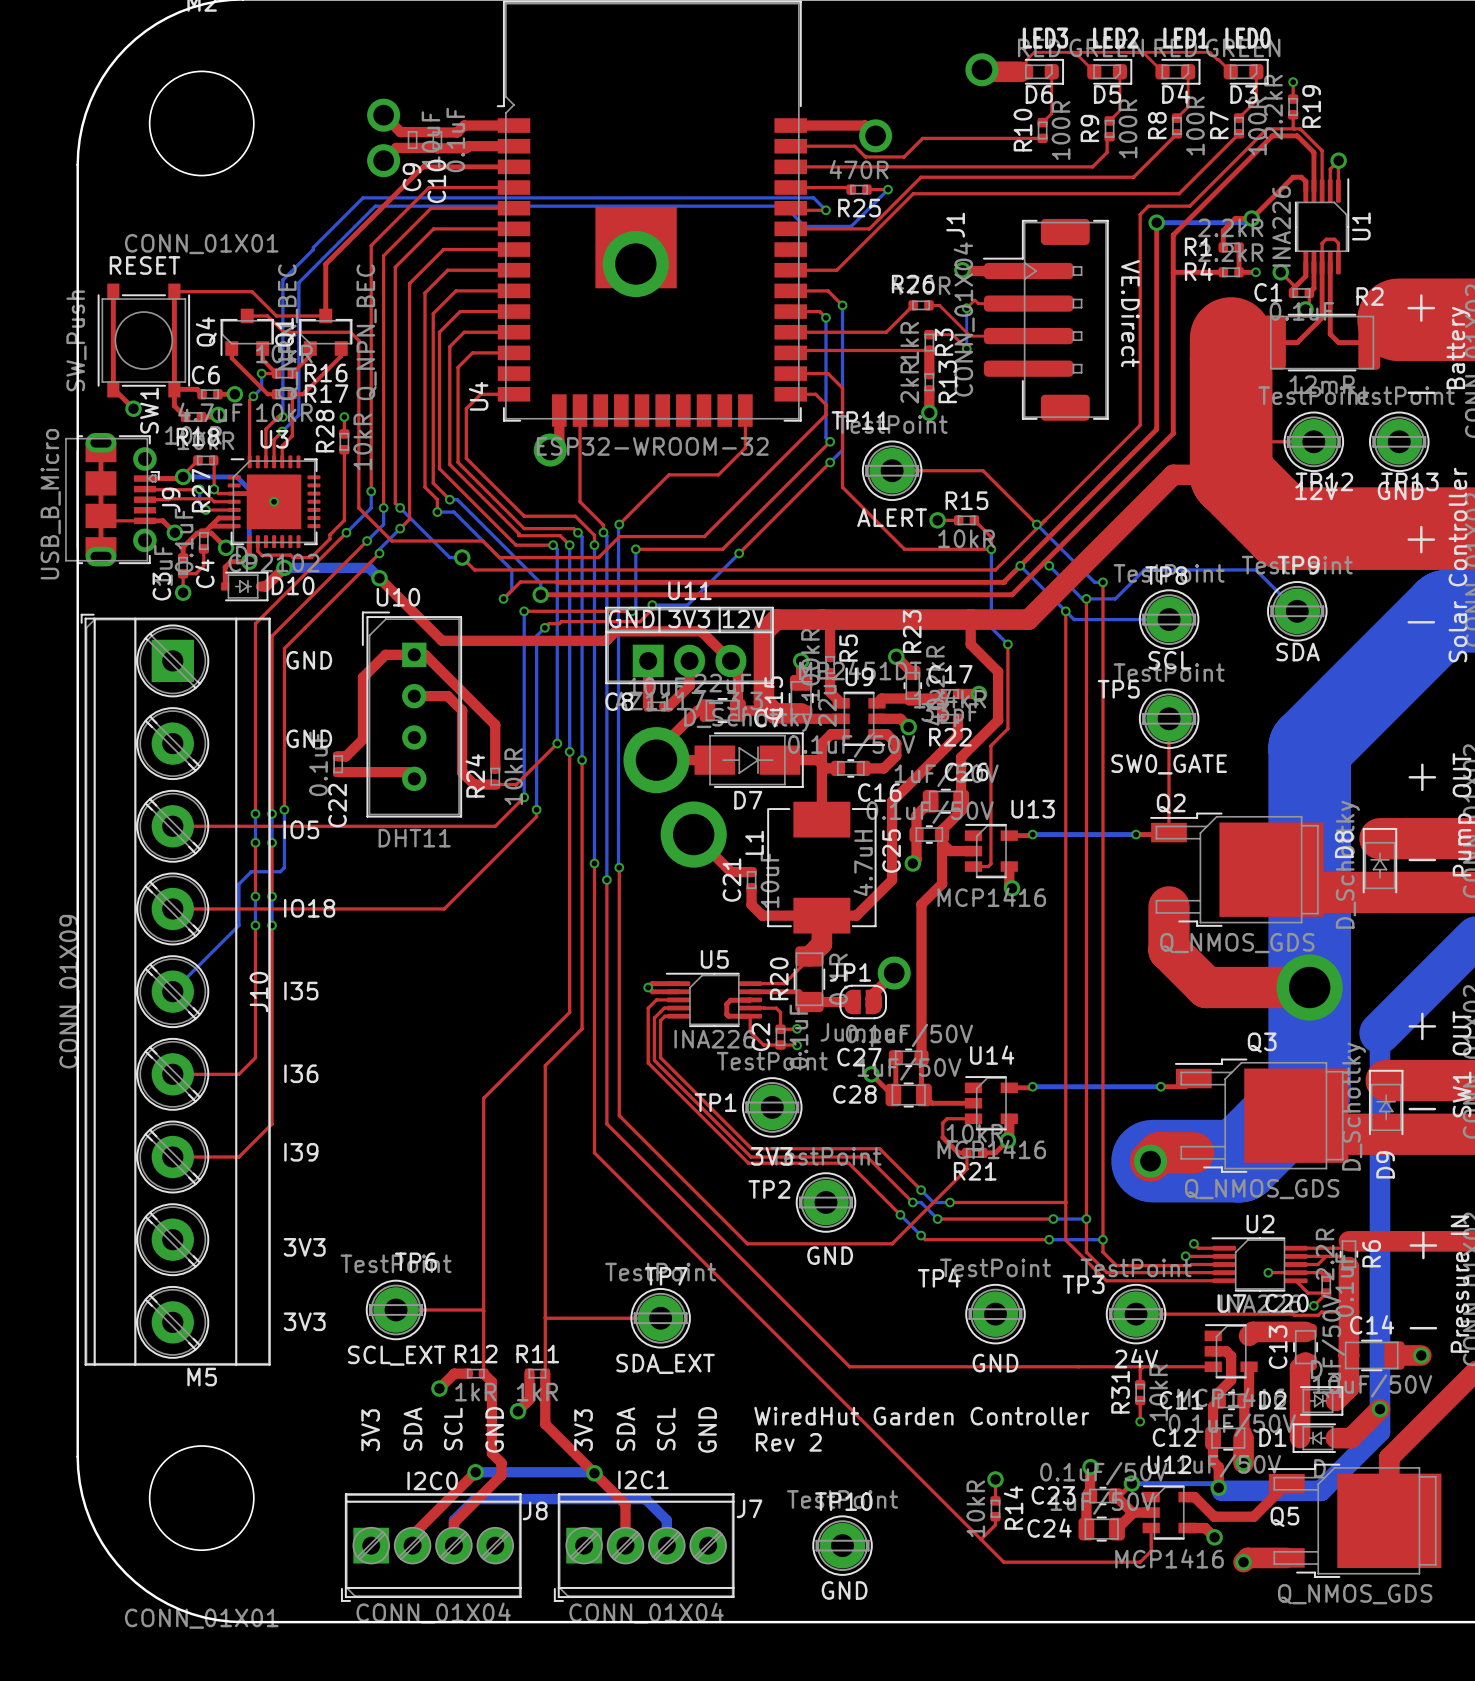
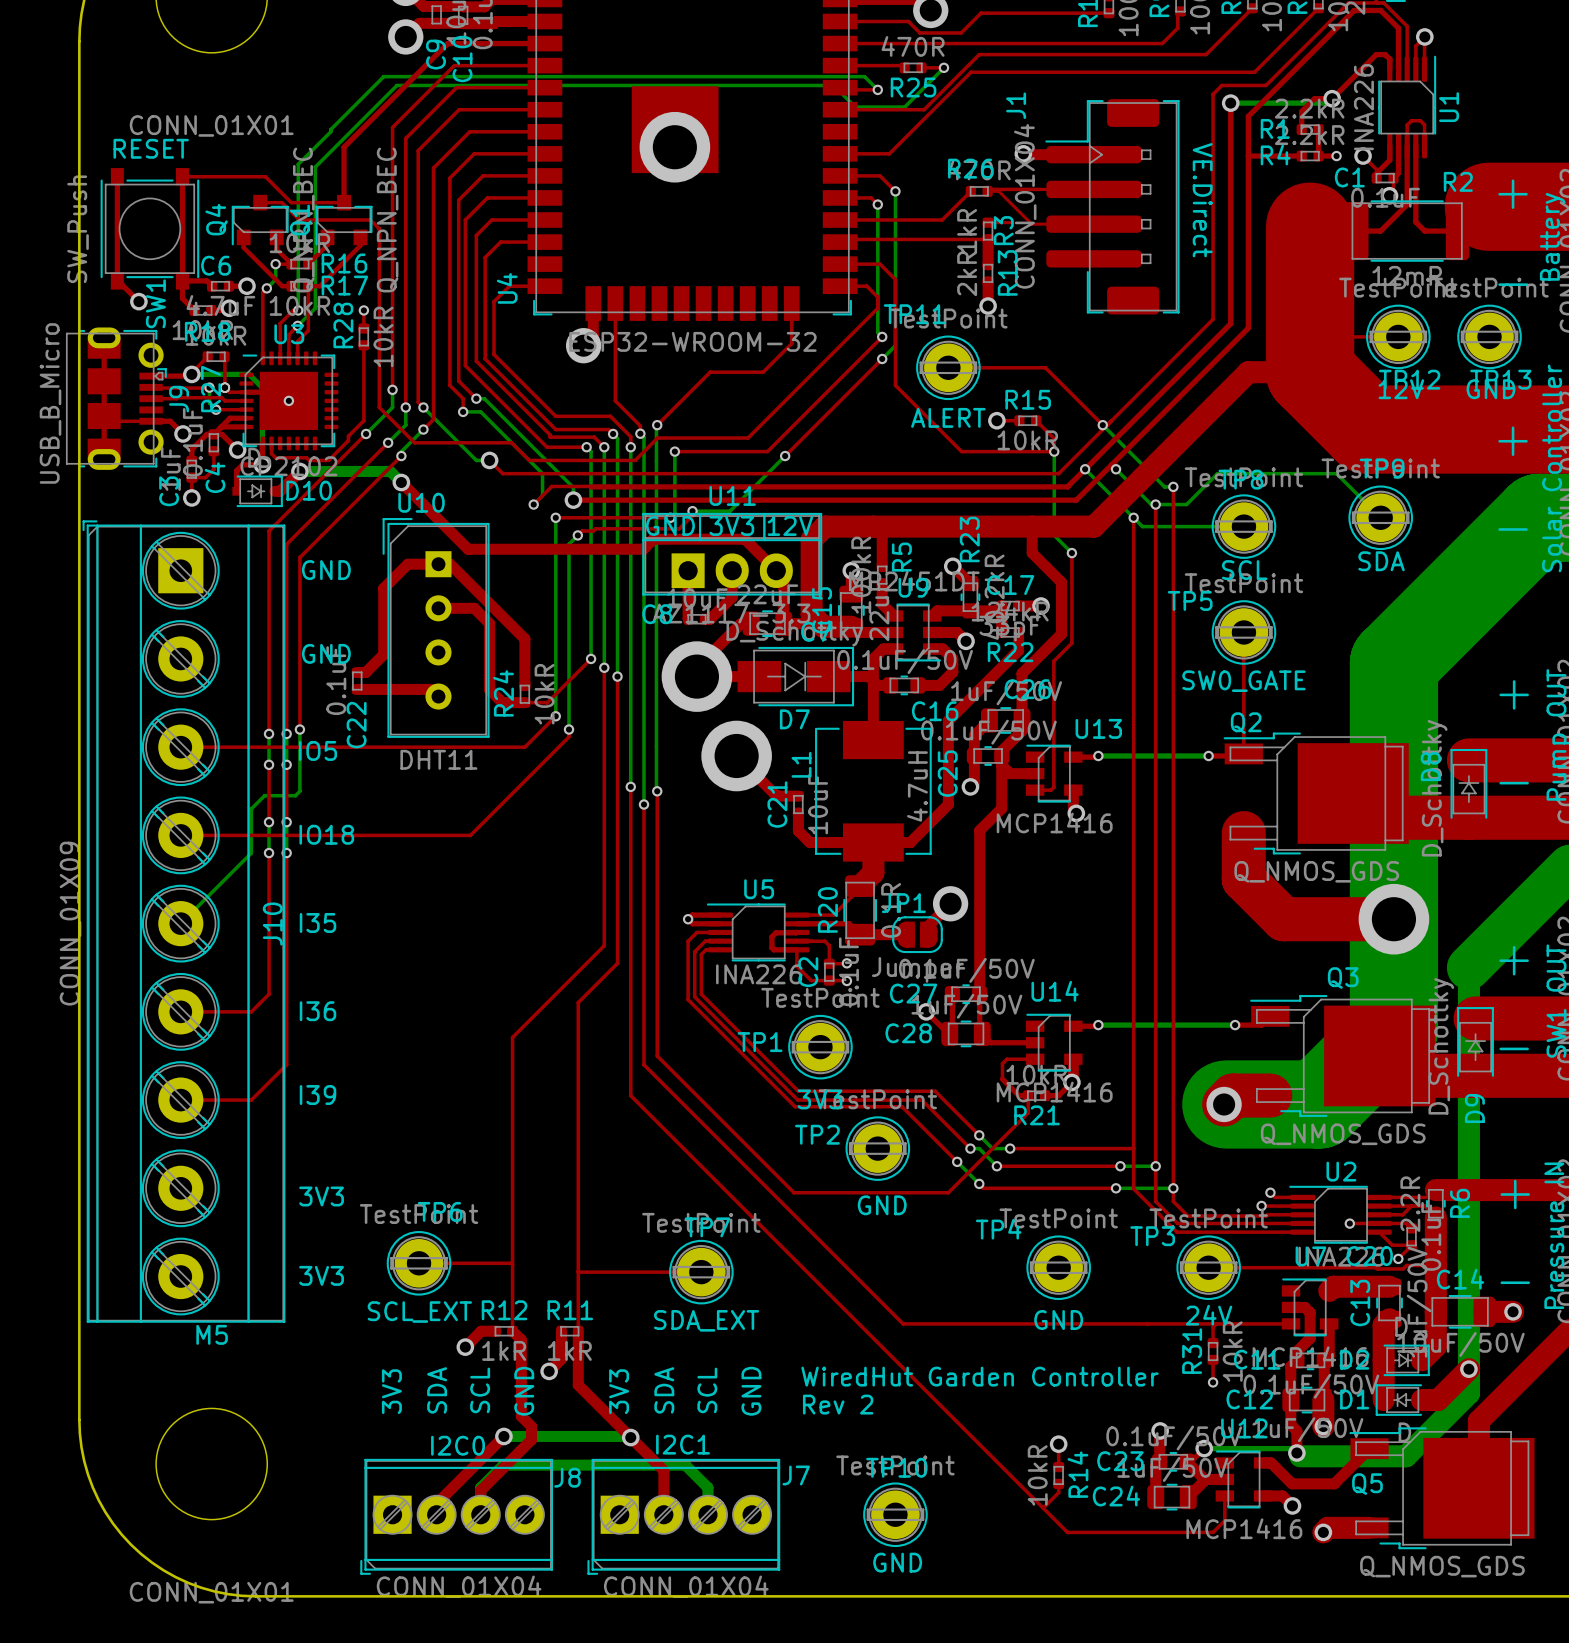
top track: (978, 303) (974, 300) (966, 308) -> (1040, 189) (989, 189) (987, 191)
bottom track: (966, 308) (966, 348) -> none
via: (966, 308) -> none
top track: (952, 334) (966, 348) -> none
via: (966, 348) -> none

